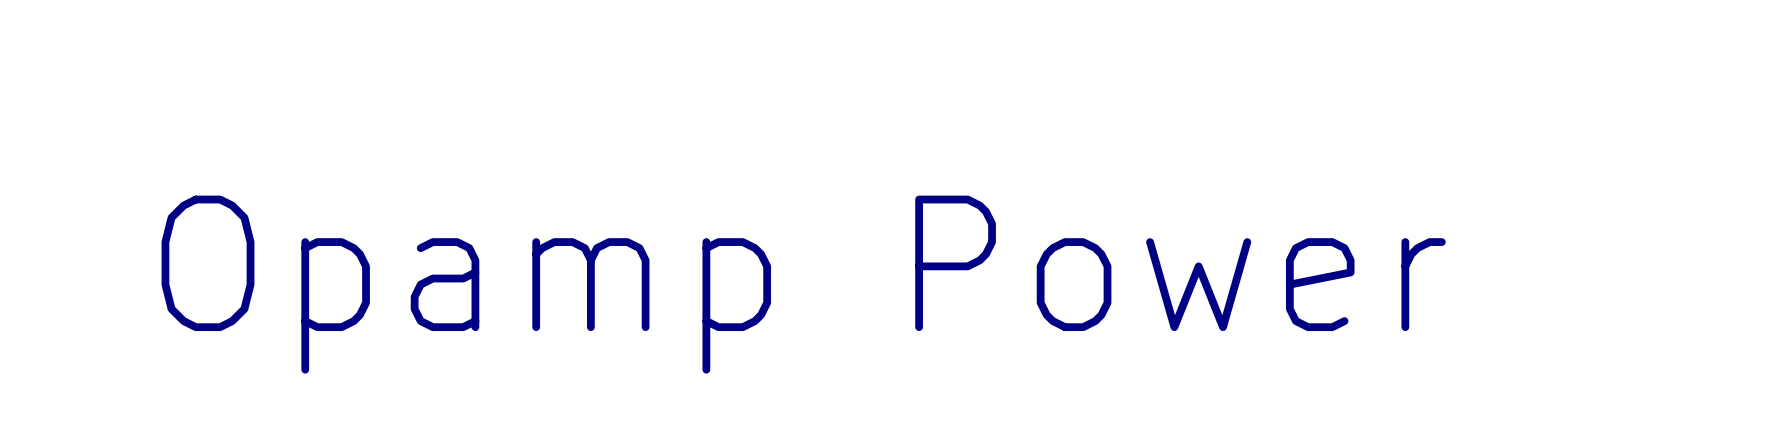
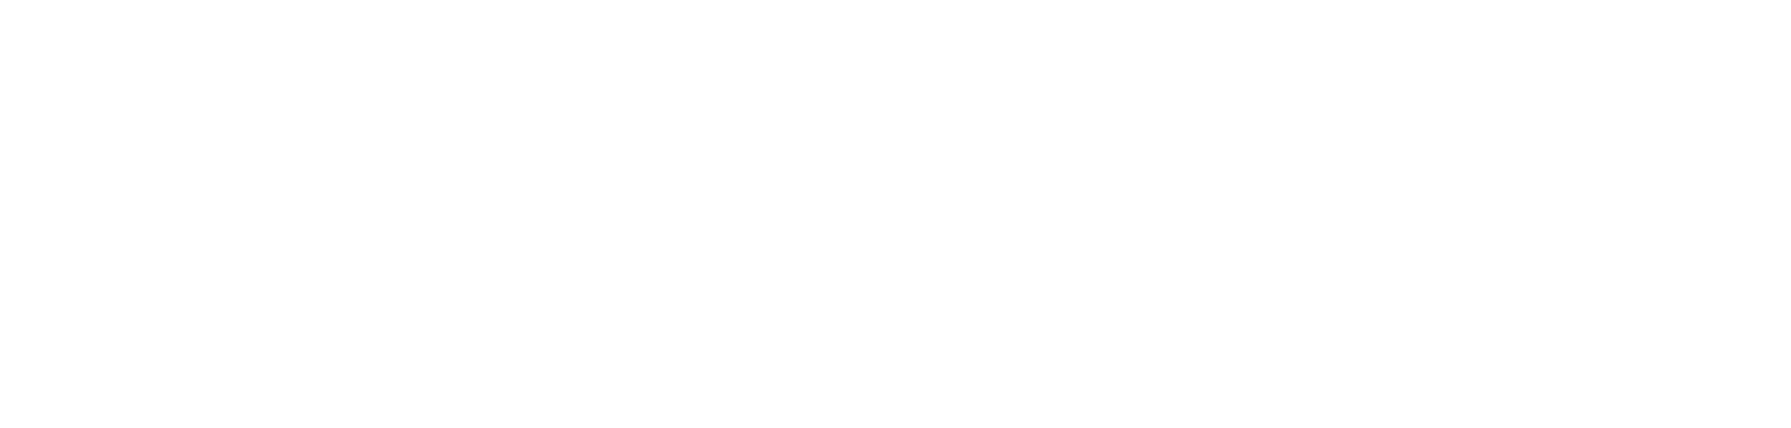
text: Opamp Power (803, 284) -> none

